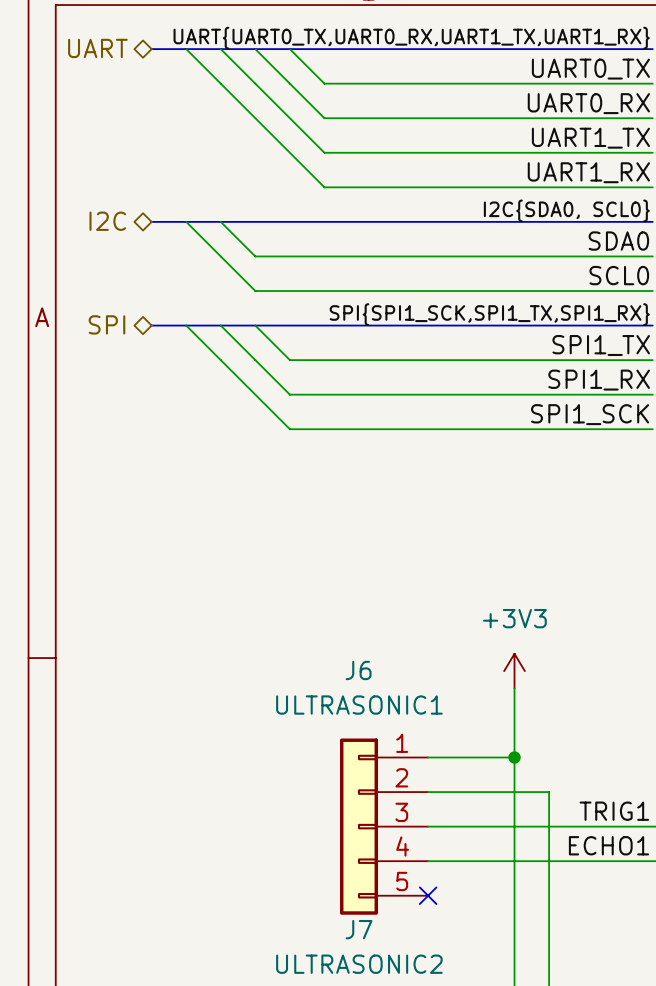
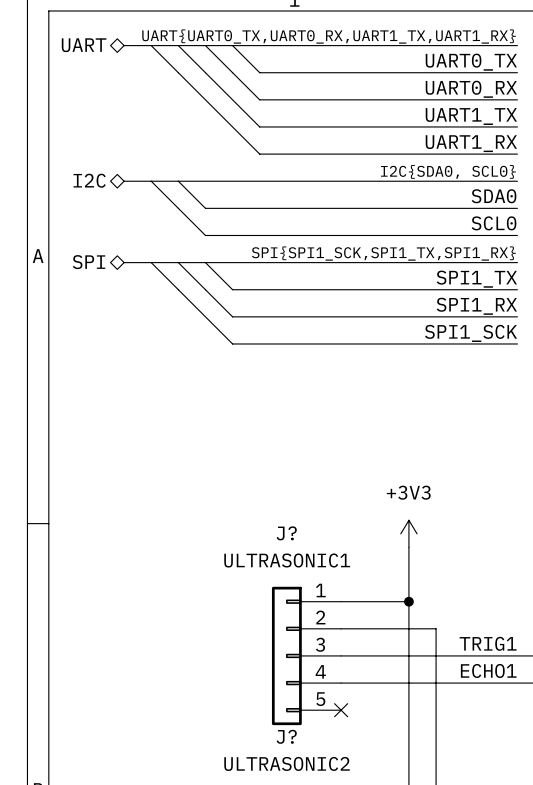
J6 name: J6 (358, 670) -> J? (286, 533)
J7 name: J7 (359, 929) -> J? (286, 736)

